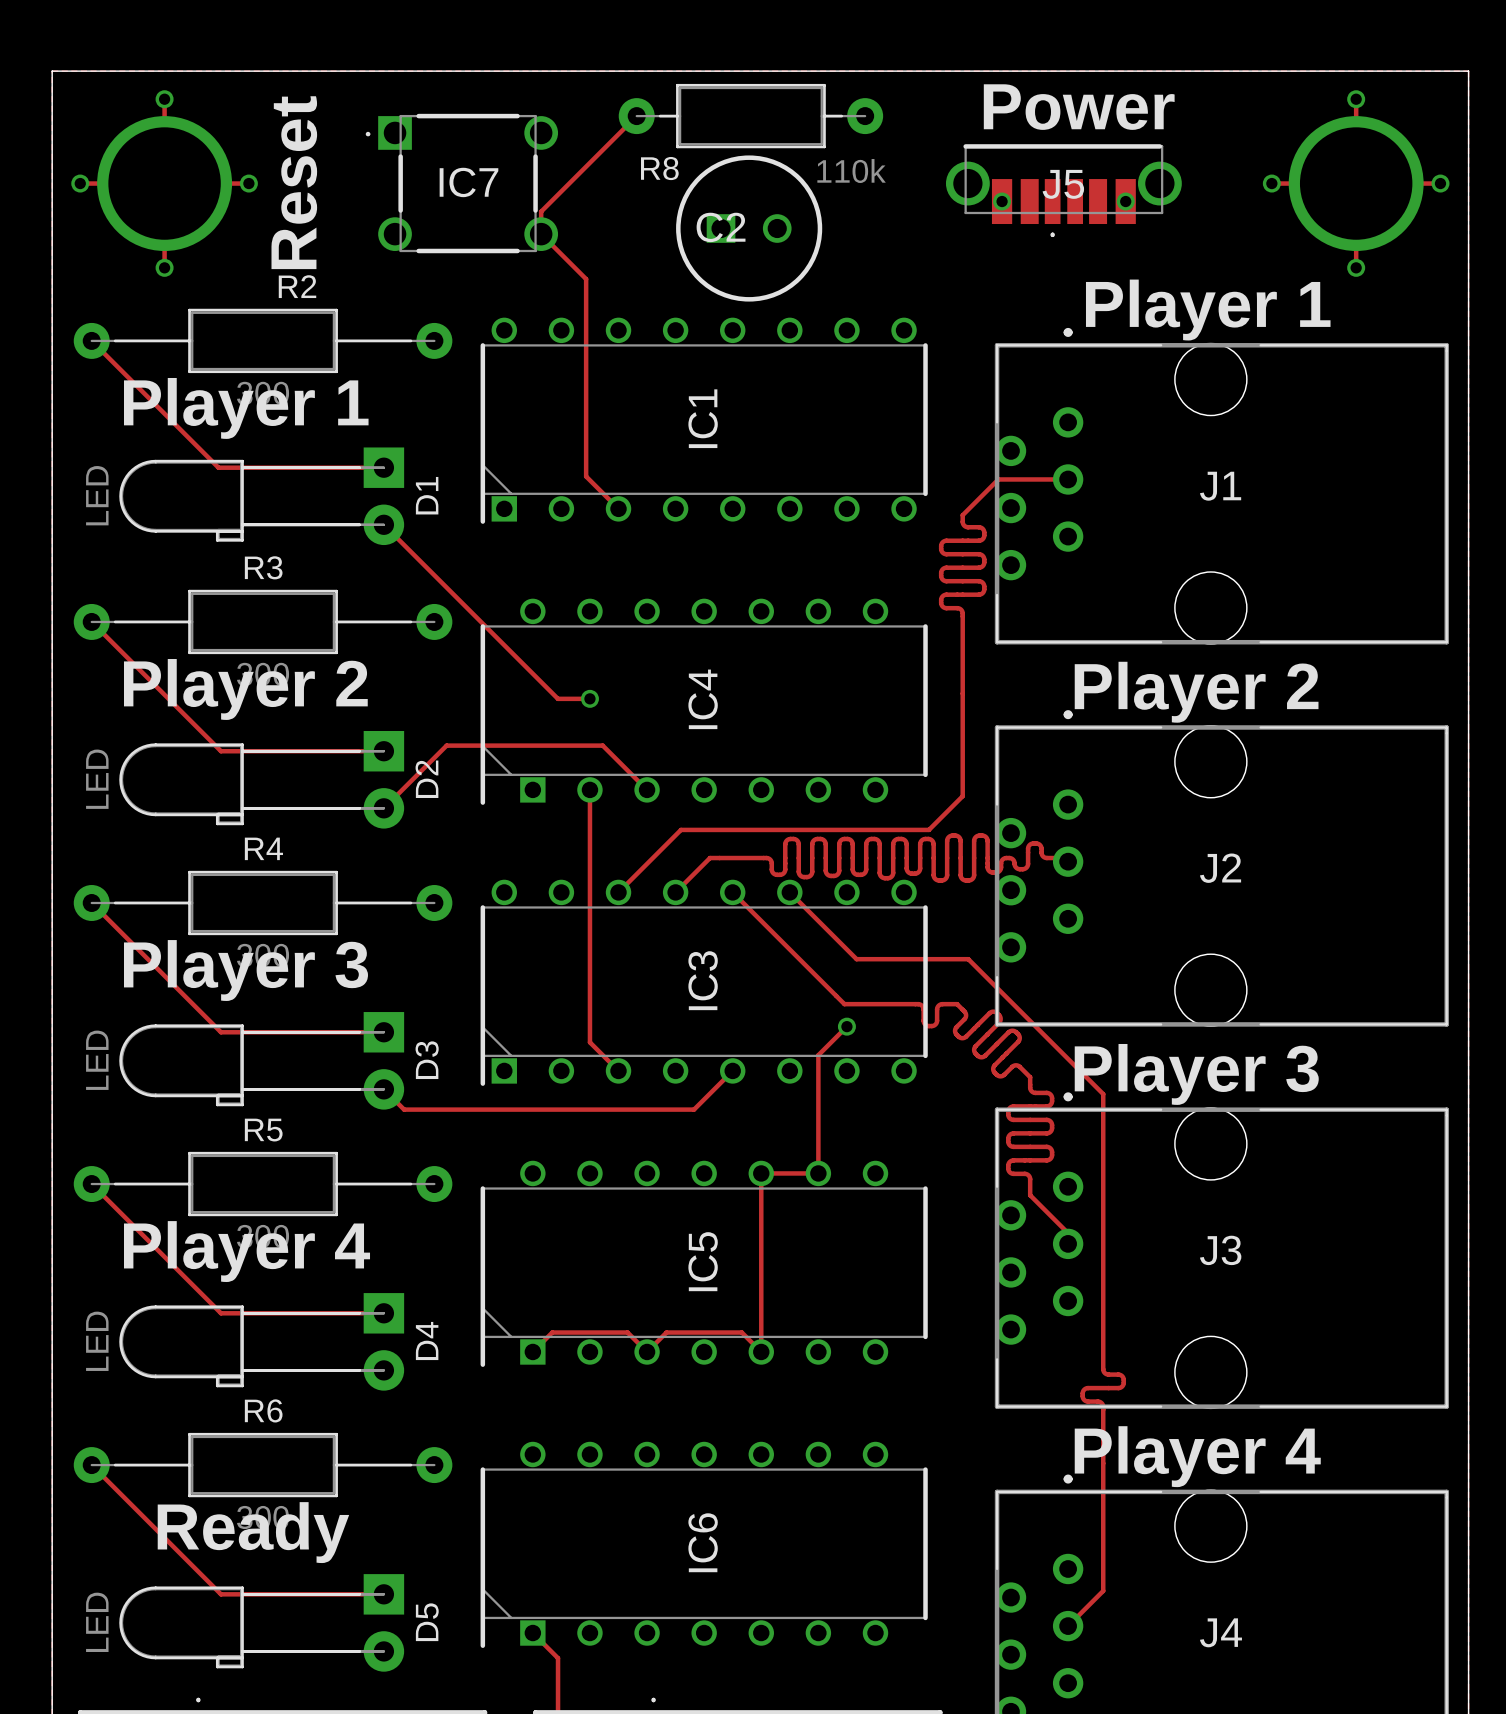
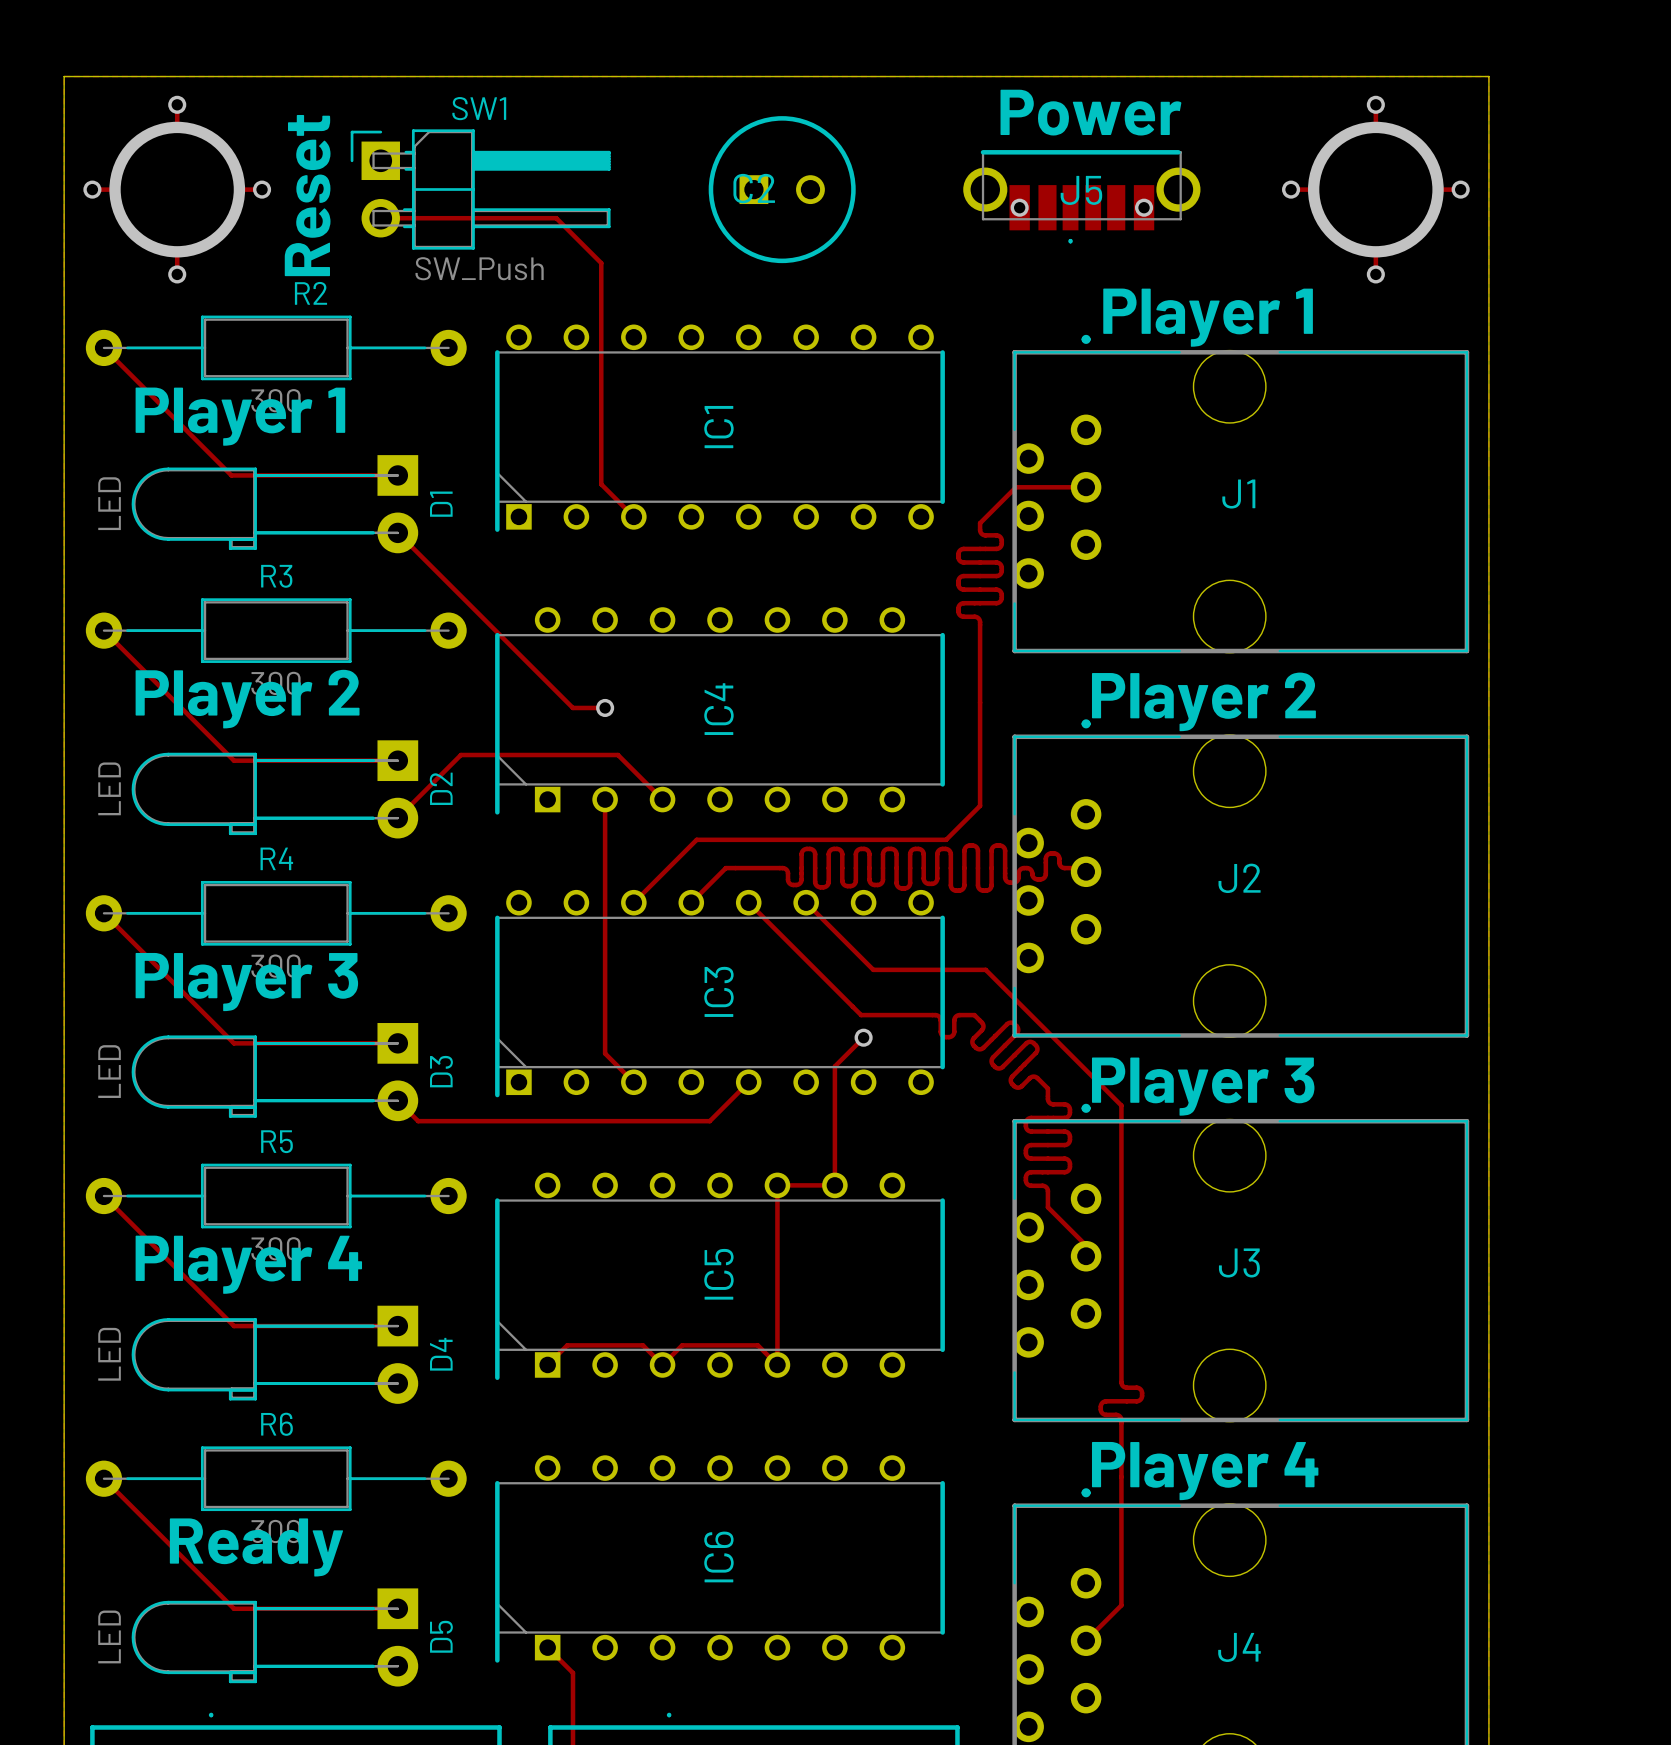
track: (636, 116) (541, 211) (541, 234) (586, 279) -> (380, 218) (556, 218) (601, 263) (601, 285)
R8: 110k (750, 116) -> none
IC7: (461, 183) -> none
SW1: none -> SW_Push (480, 189)
C2 position: (749, 228) -> (782, 189)

